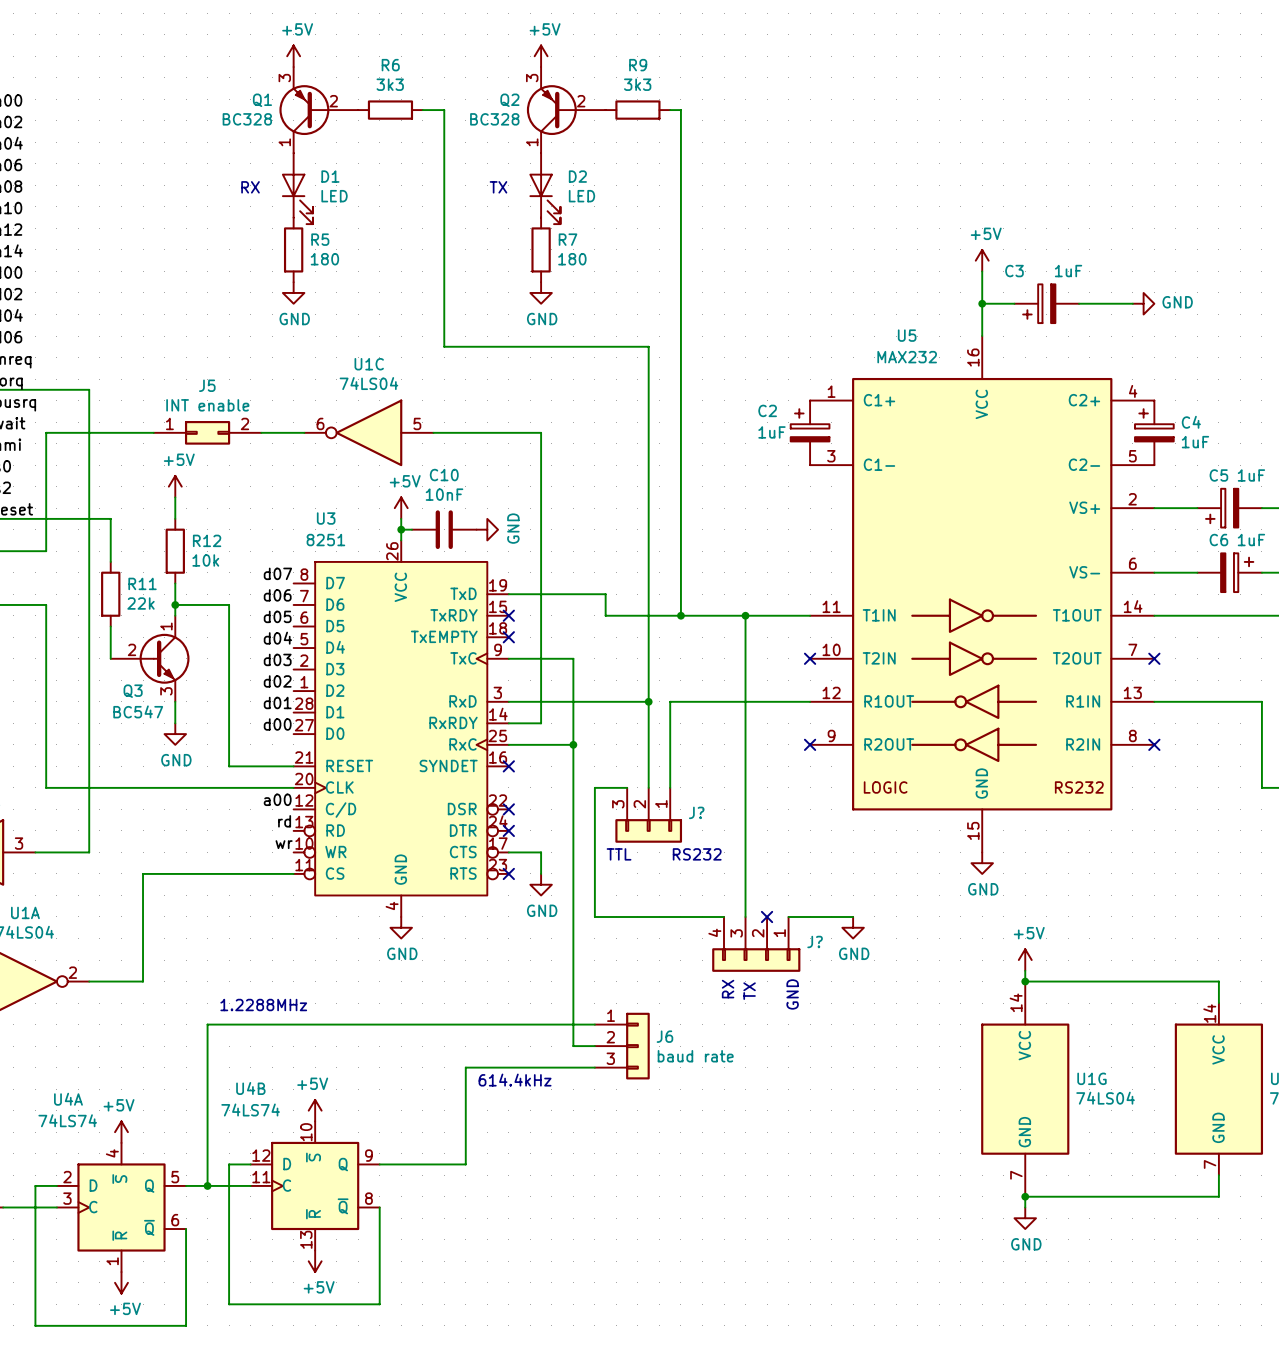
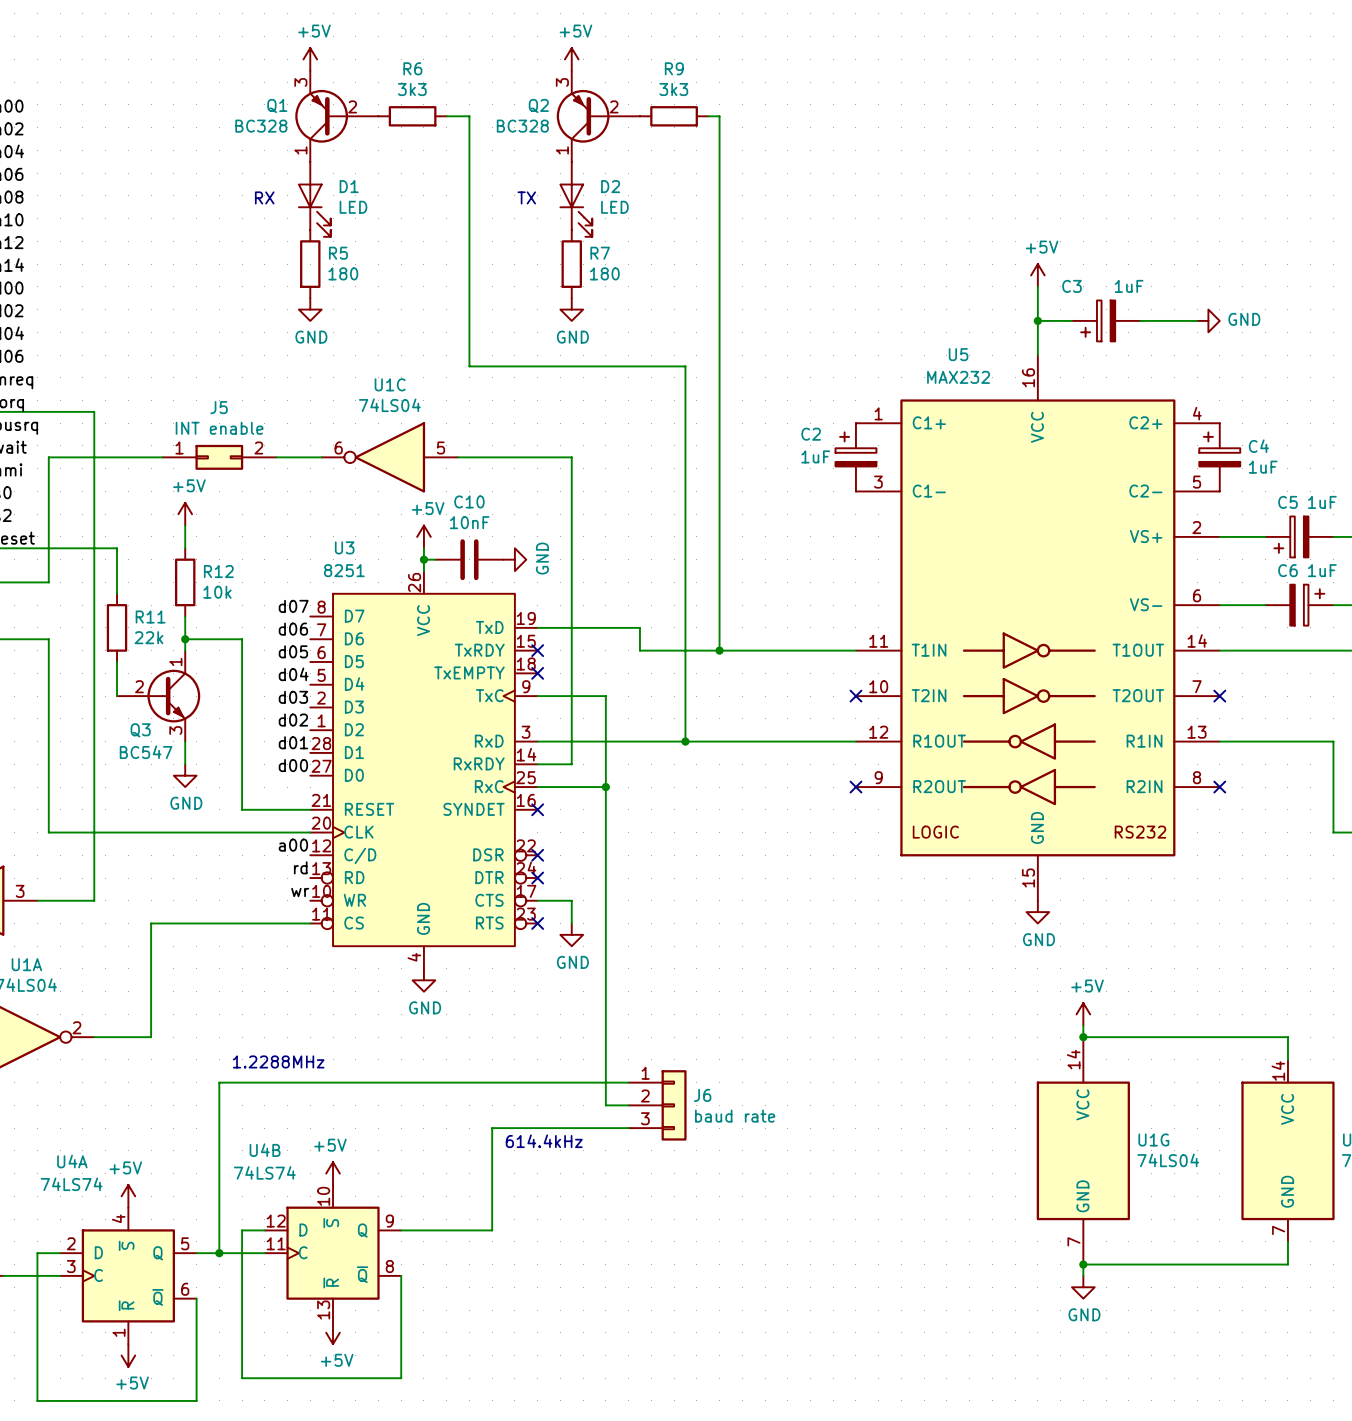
wire: (745, 615) (745, 916) -> none
junction: (745, 615) -> none
wire: (648, 701) (648, 787) -> (685, 741) (708, 741)
wire: (670, 701) (670, 787) -> none
wire: (627, 787) (594, 787) (594, 916) (724, 916) -> none
J?: (648, 815) -> none
text: TTL (619, 854) -> none
text: RS232 (697, 854) -> none
no-connect mark: (767, 916) -> none
wire: (788, 916) (853, 916) -> none
power symbol: GND (853, 927) -> none
J?: (756, 944) -> none
text: RX (728, 989) -> none
text: TX (749, 991) -> none
text: GND (792, 994) -> none

